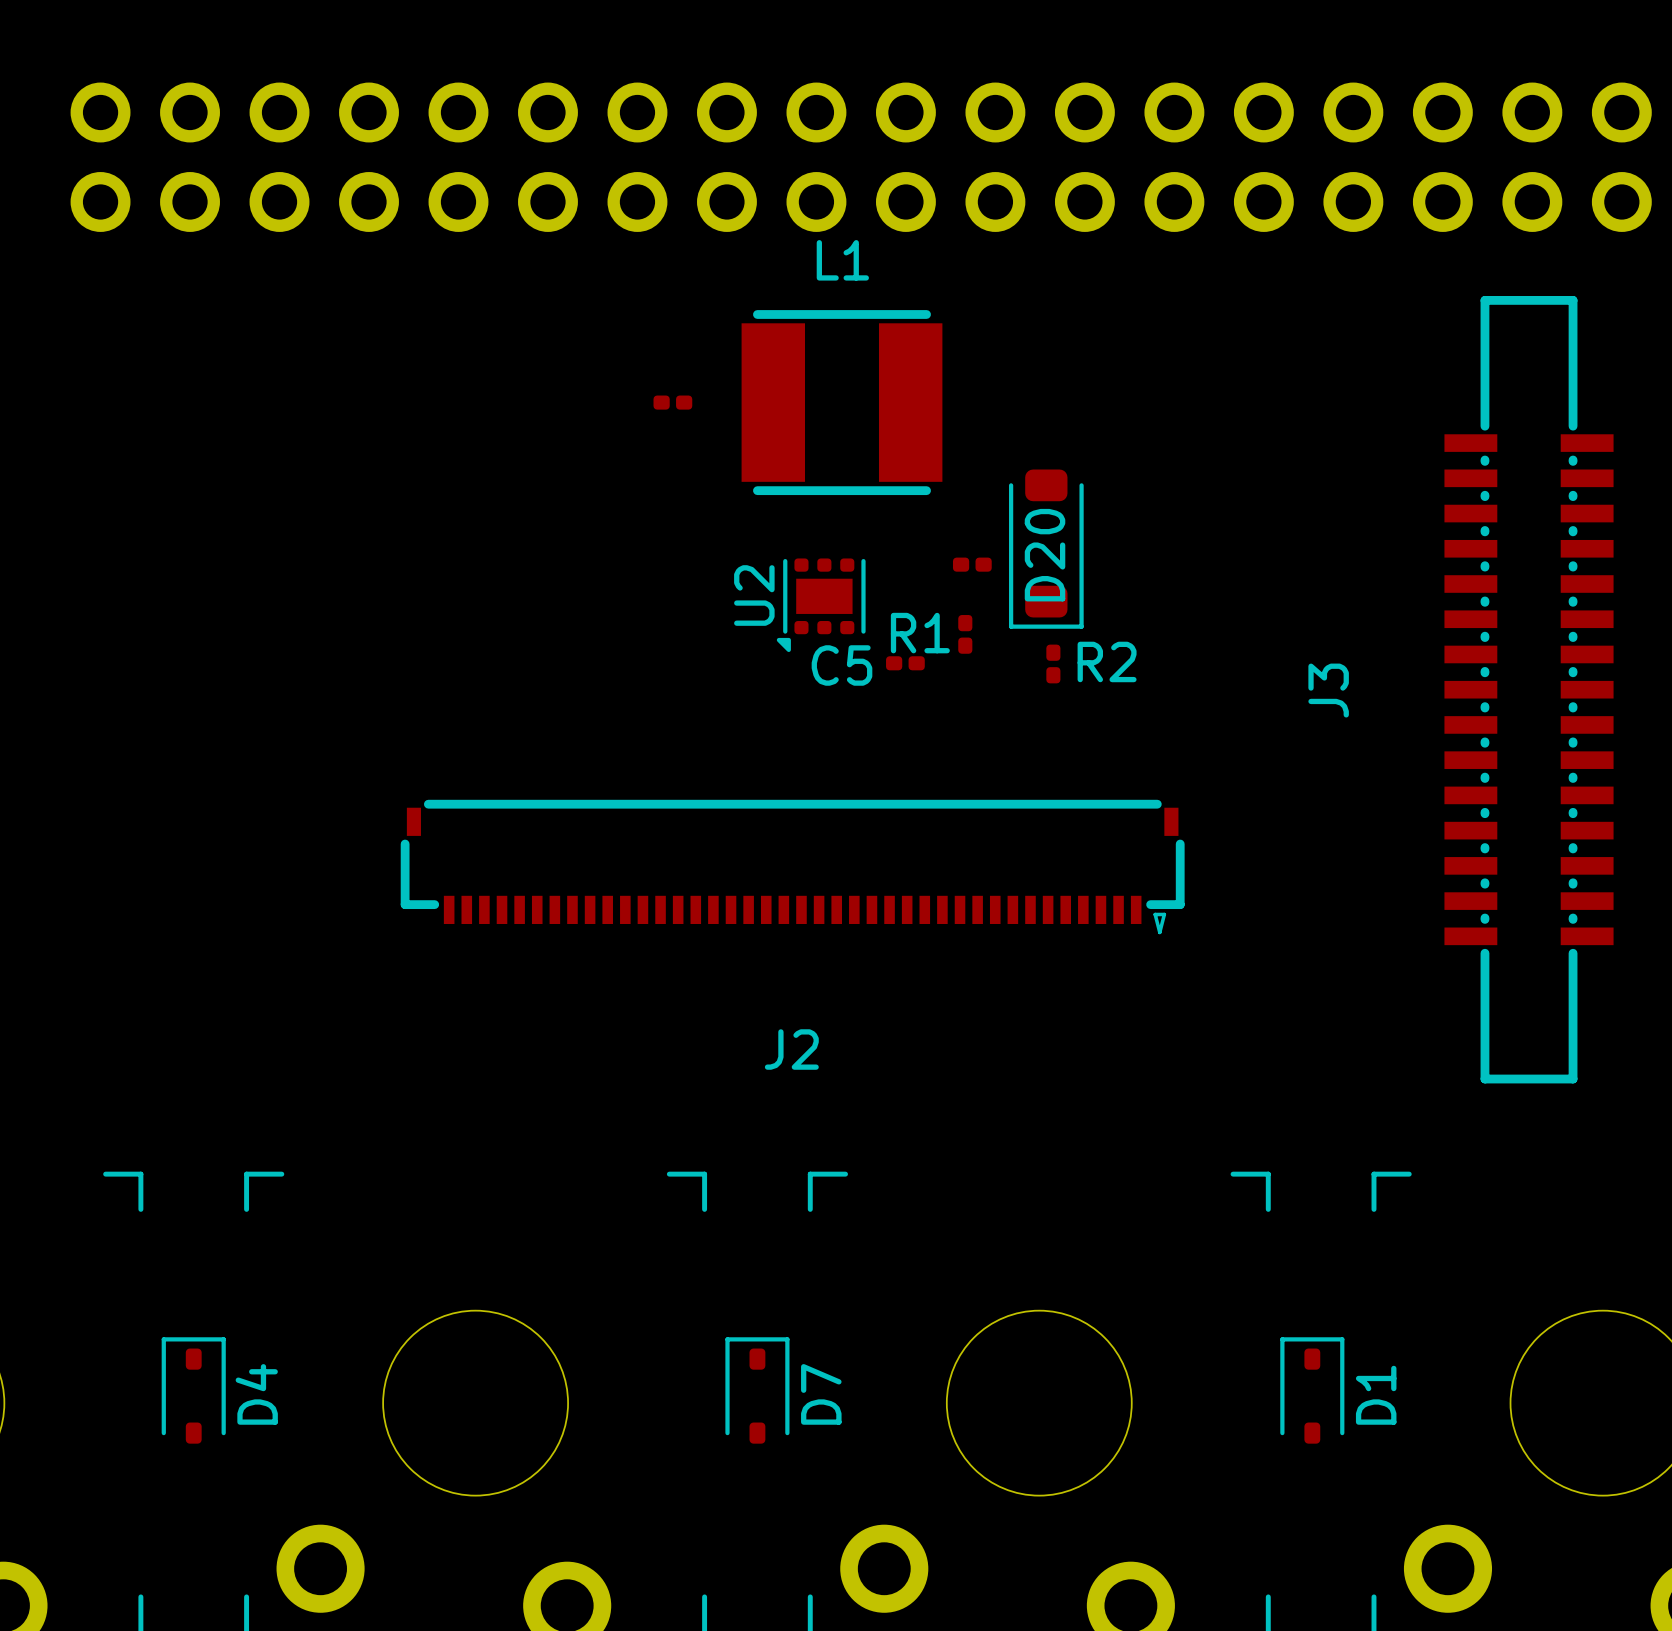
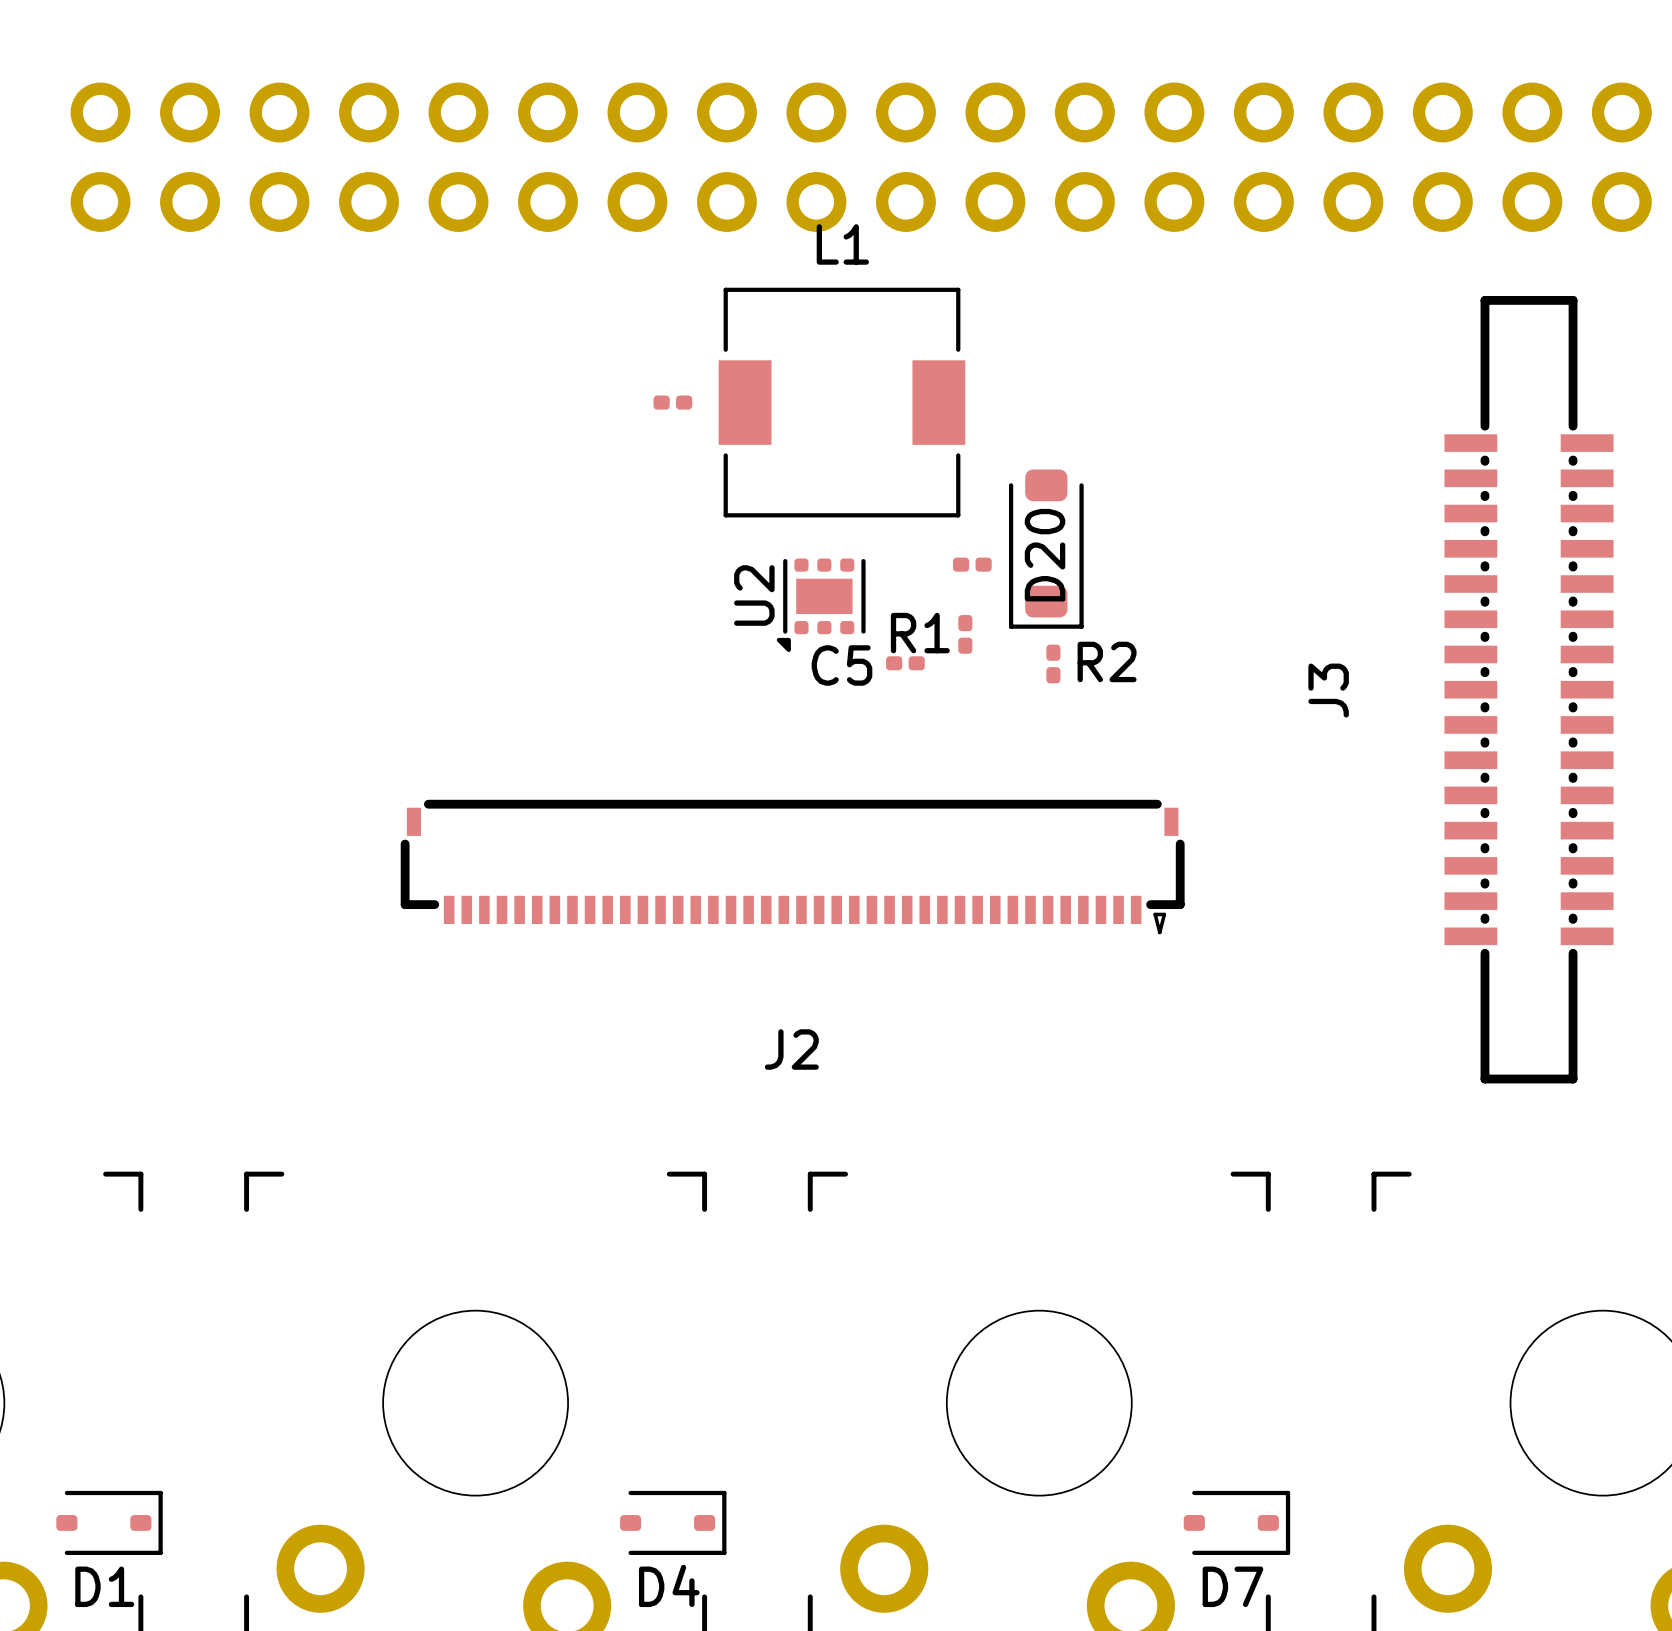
L1 footprint: [741, 310, 943, 496] -> [718, 287, 966, 518]
D4 rotation: 0° (193, 1390) -> 90° clockwise (673, 1522)
D4 position: (193, 1390) -> (673, 1522)
D7 rotation: 0° (757, 1390) -> 90° clockwise (1236, 1522)
D7 position: (757, 1390) -> (1236, 1522)
D1 rotation: 0° (1312, 1390) -> 90° clockwise (109, 1522)
D1 position: (1312, 1390) -> (109, 1522)

